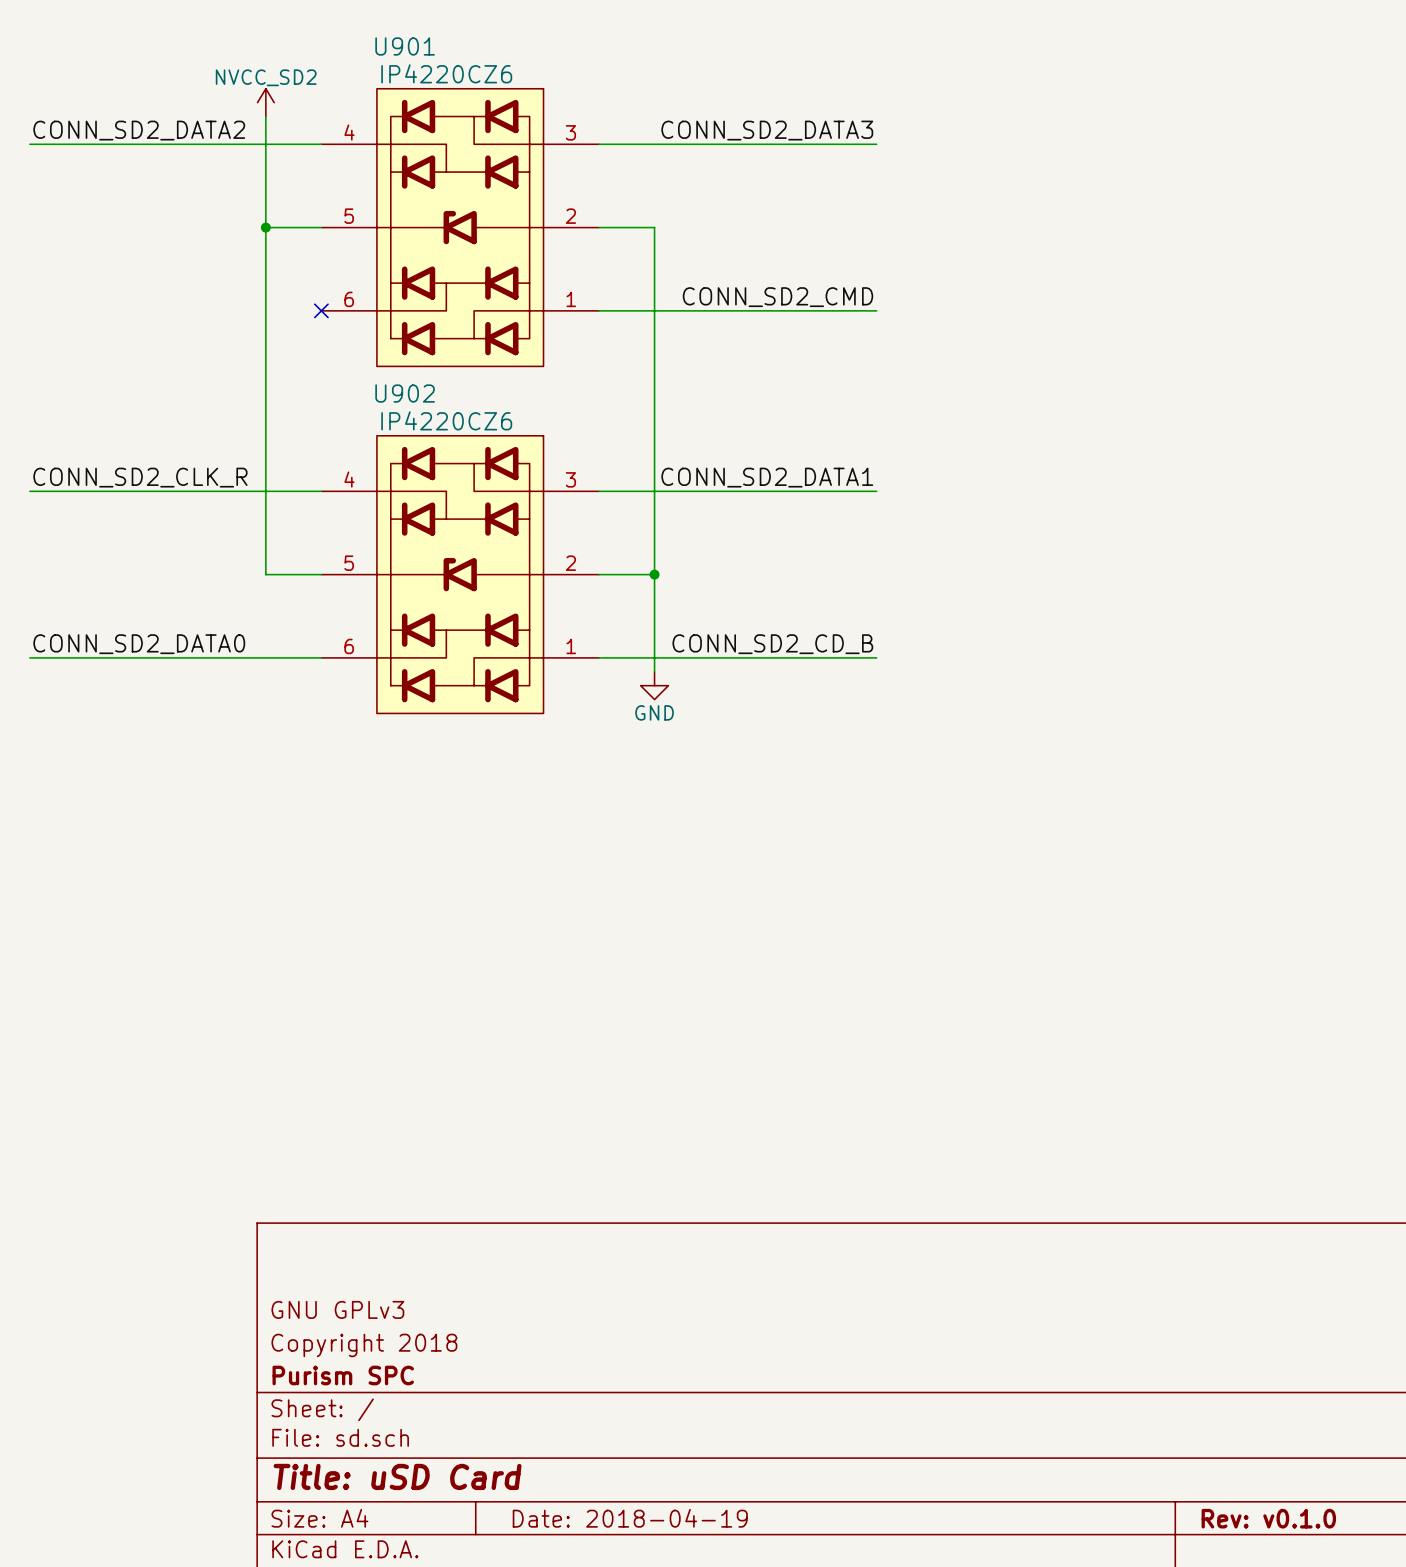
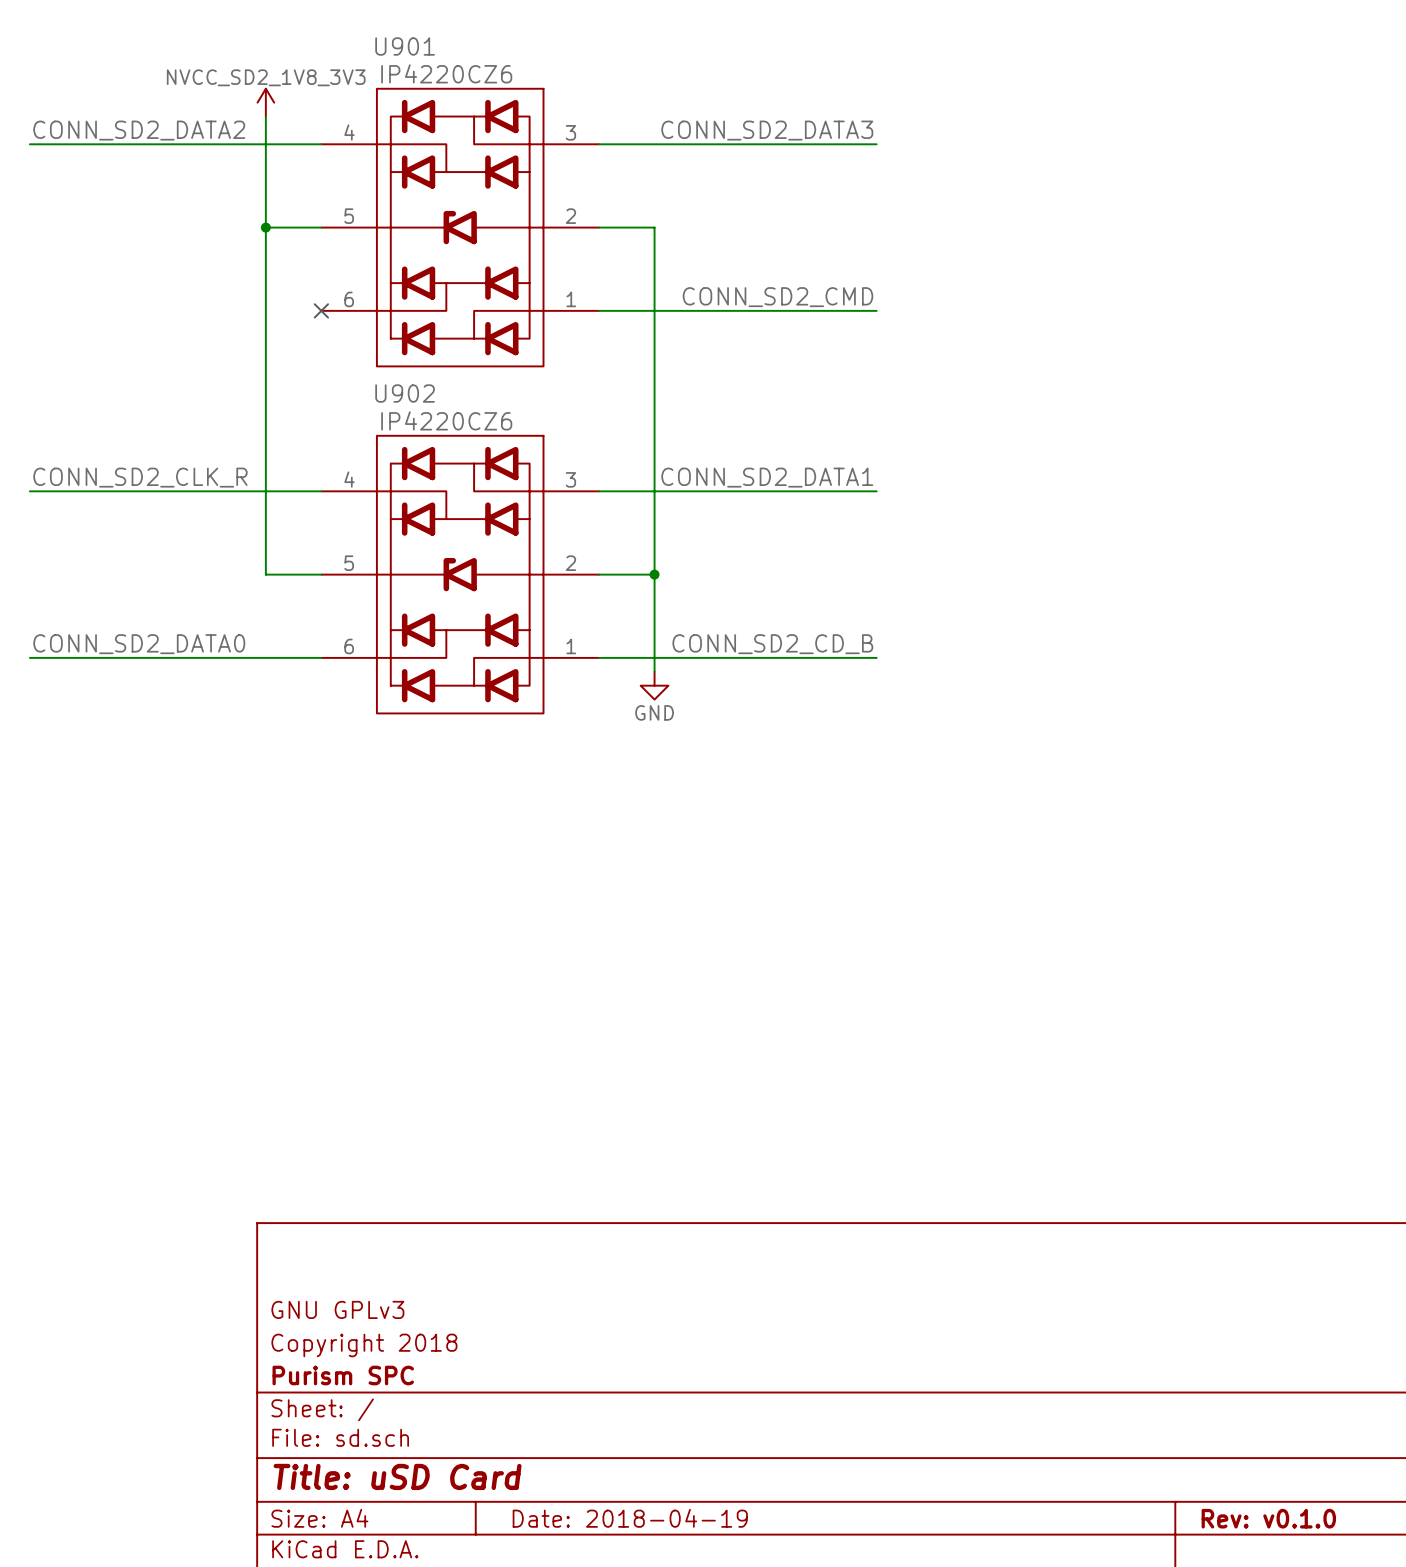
power symbol: NVCC_SD2 (265, 102) -> NVCC_SD2_1V8_3V3 (265, 102)

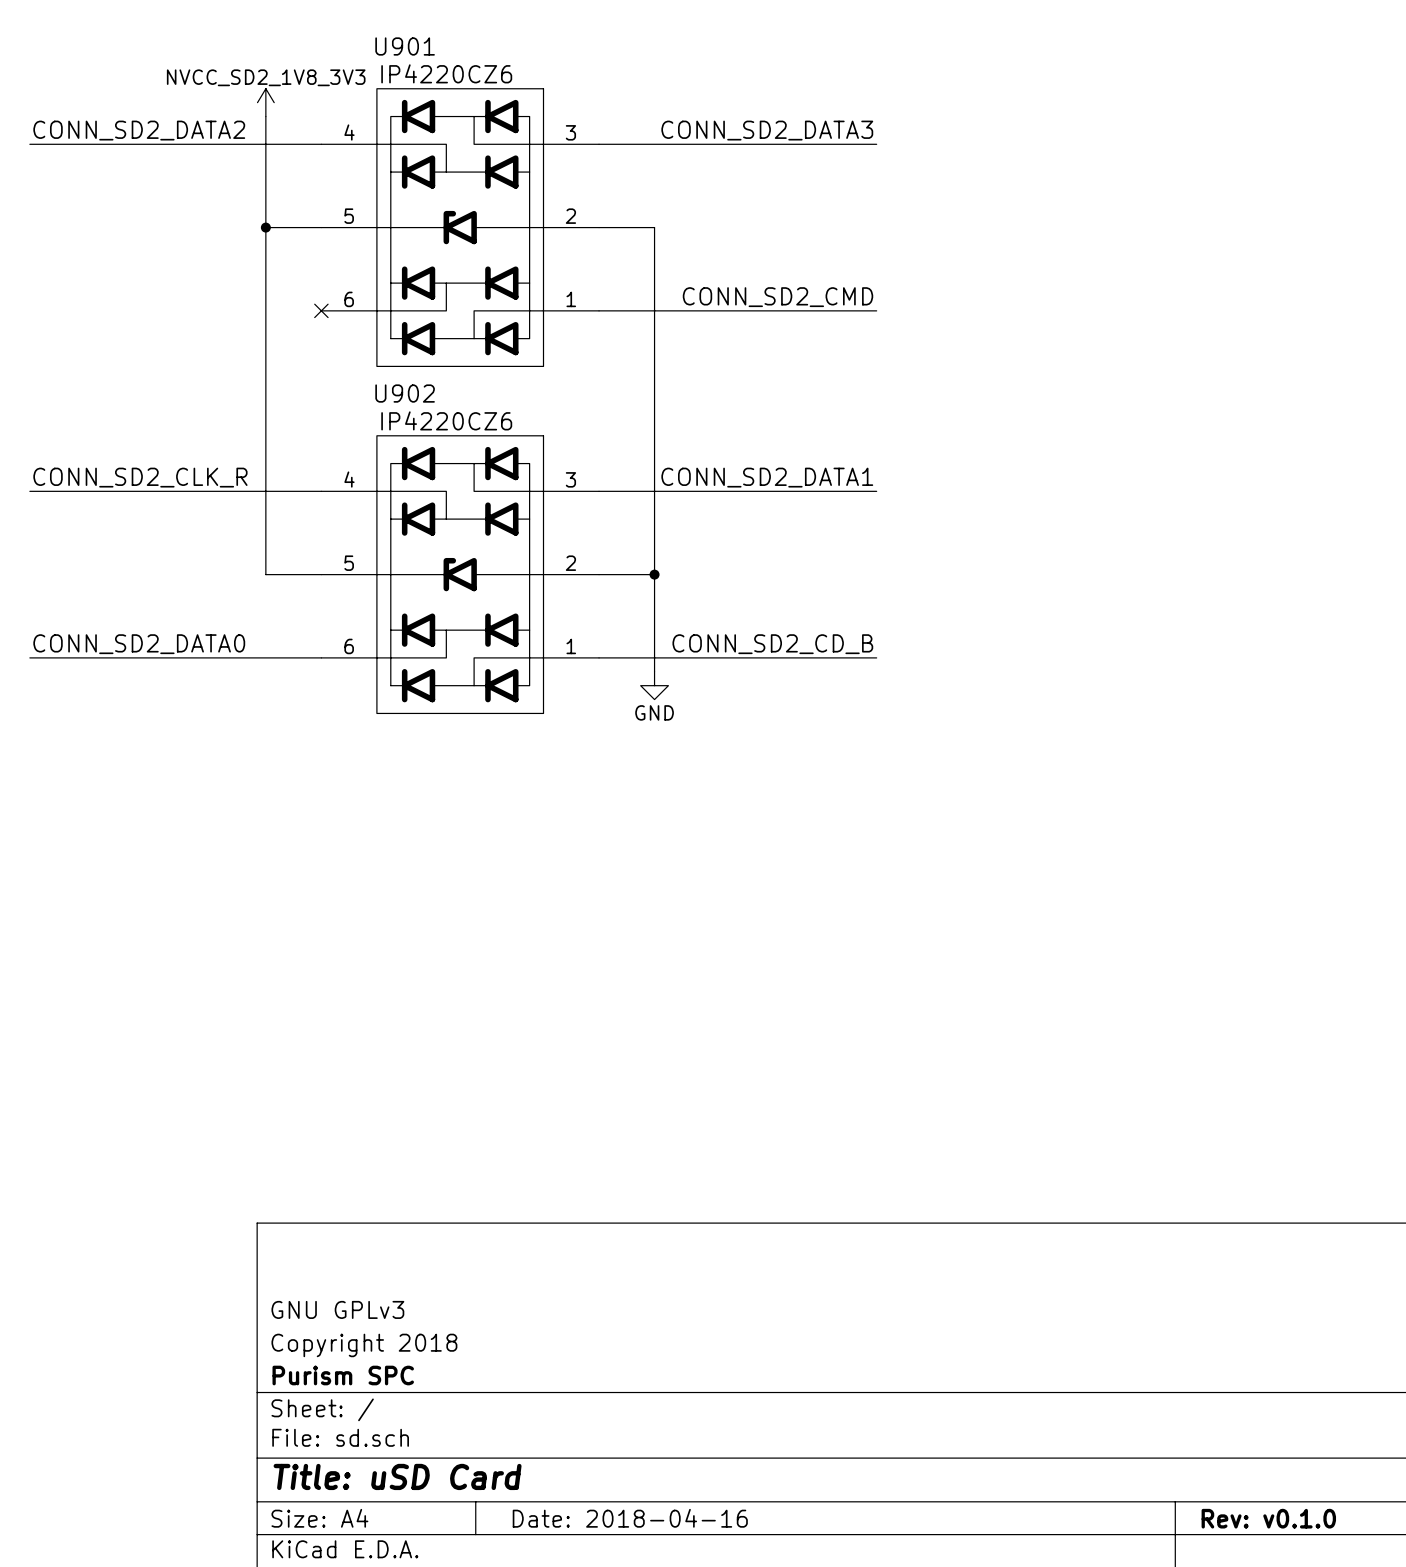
title block: Date: 2018-04-19 (630, 1518) -> Date: 2018-04-16 (630, 1518)

